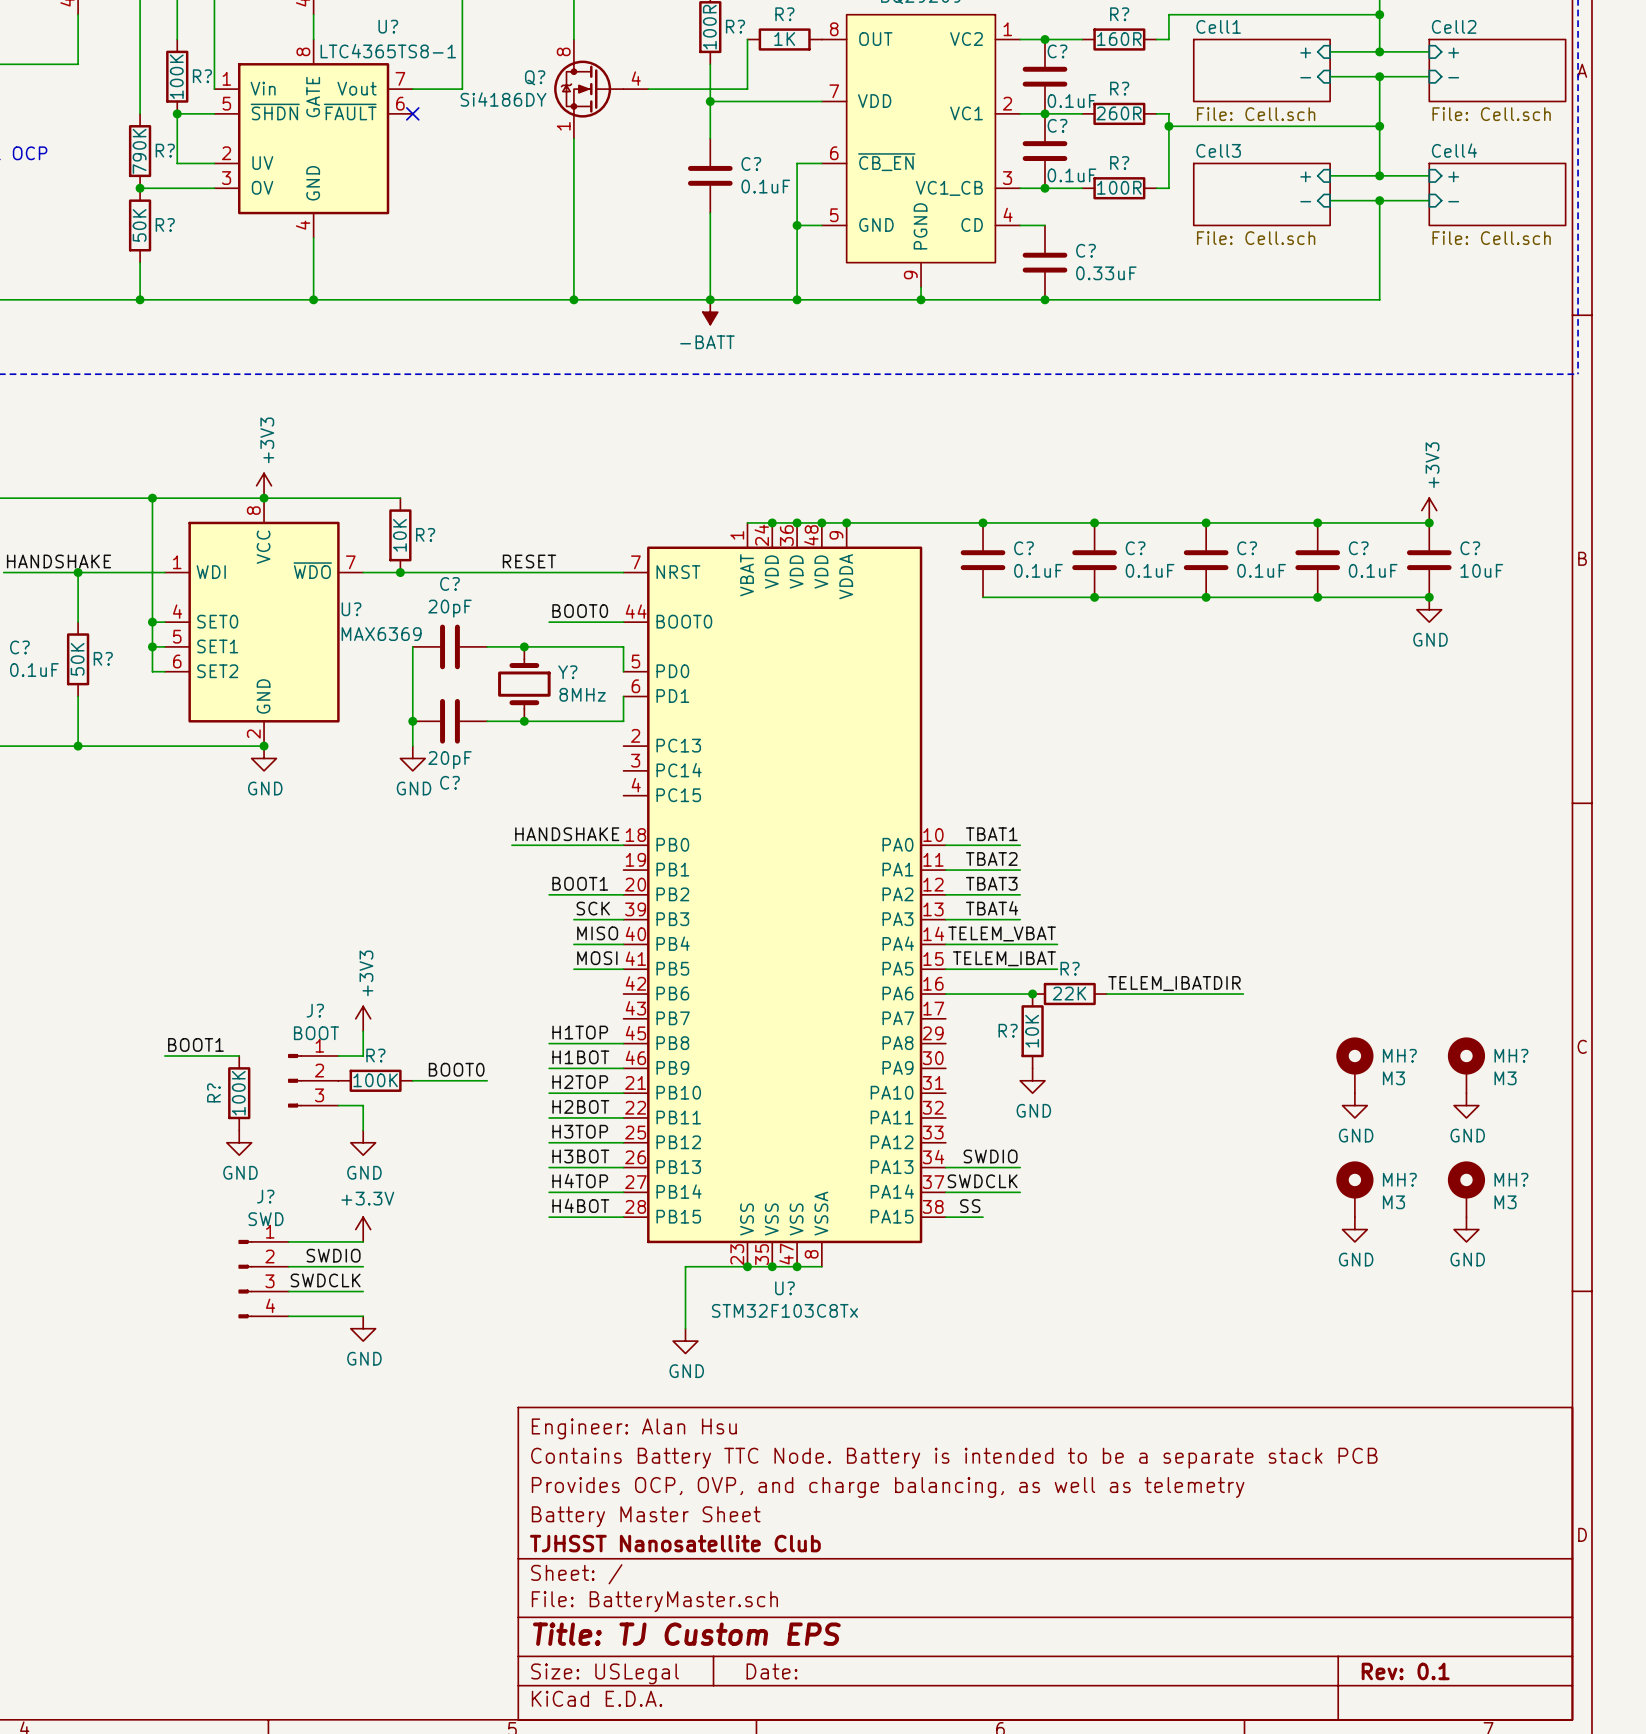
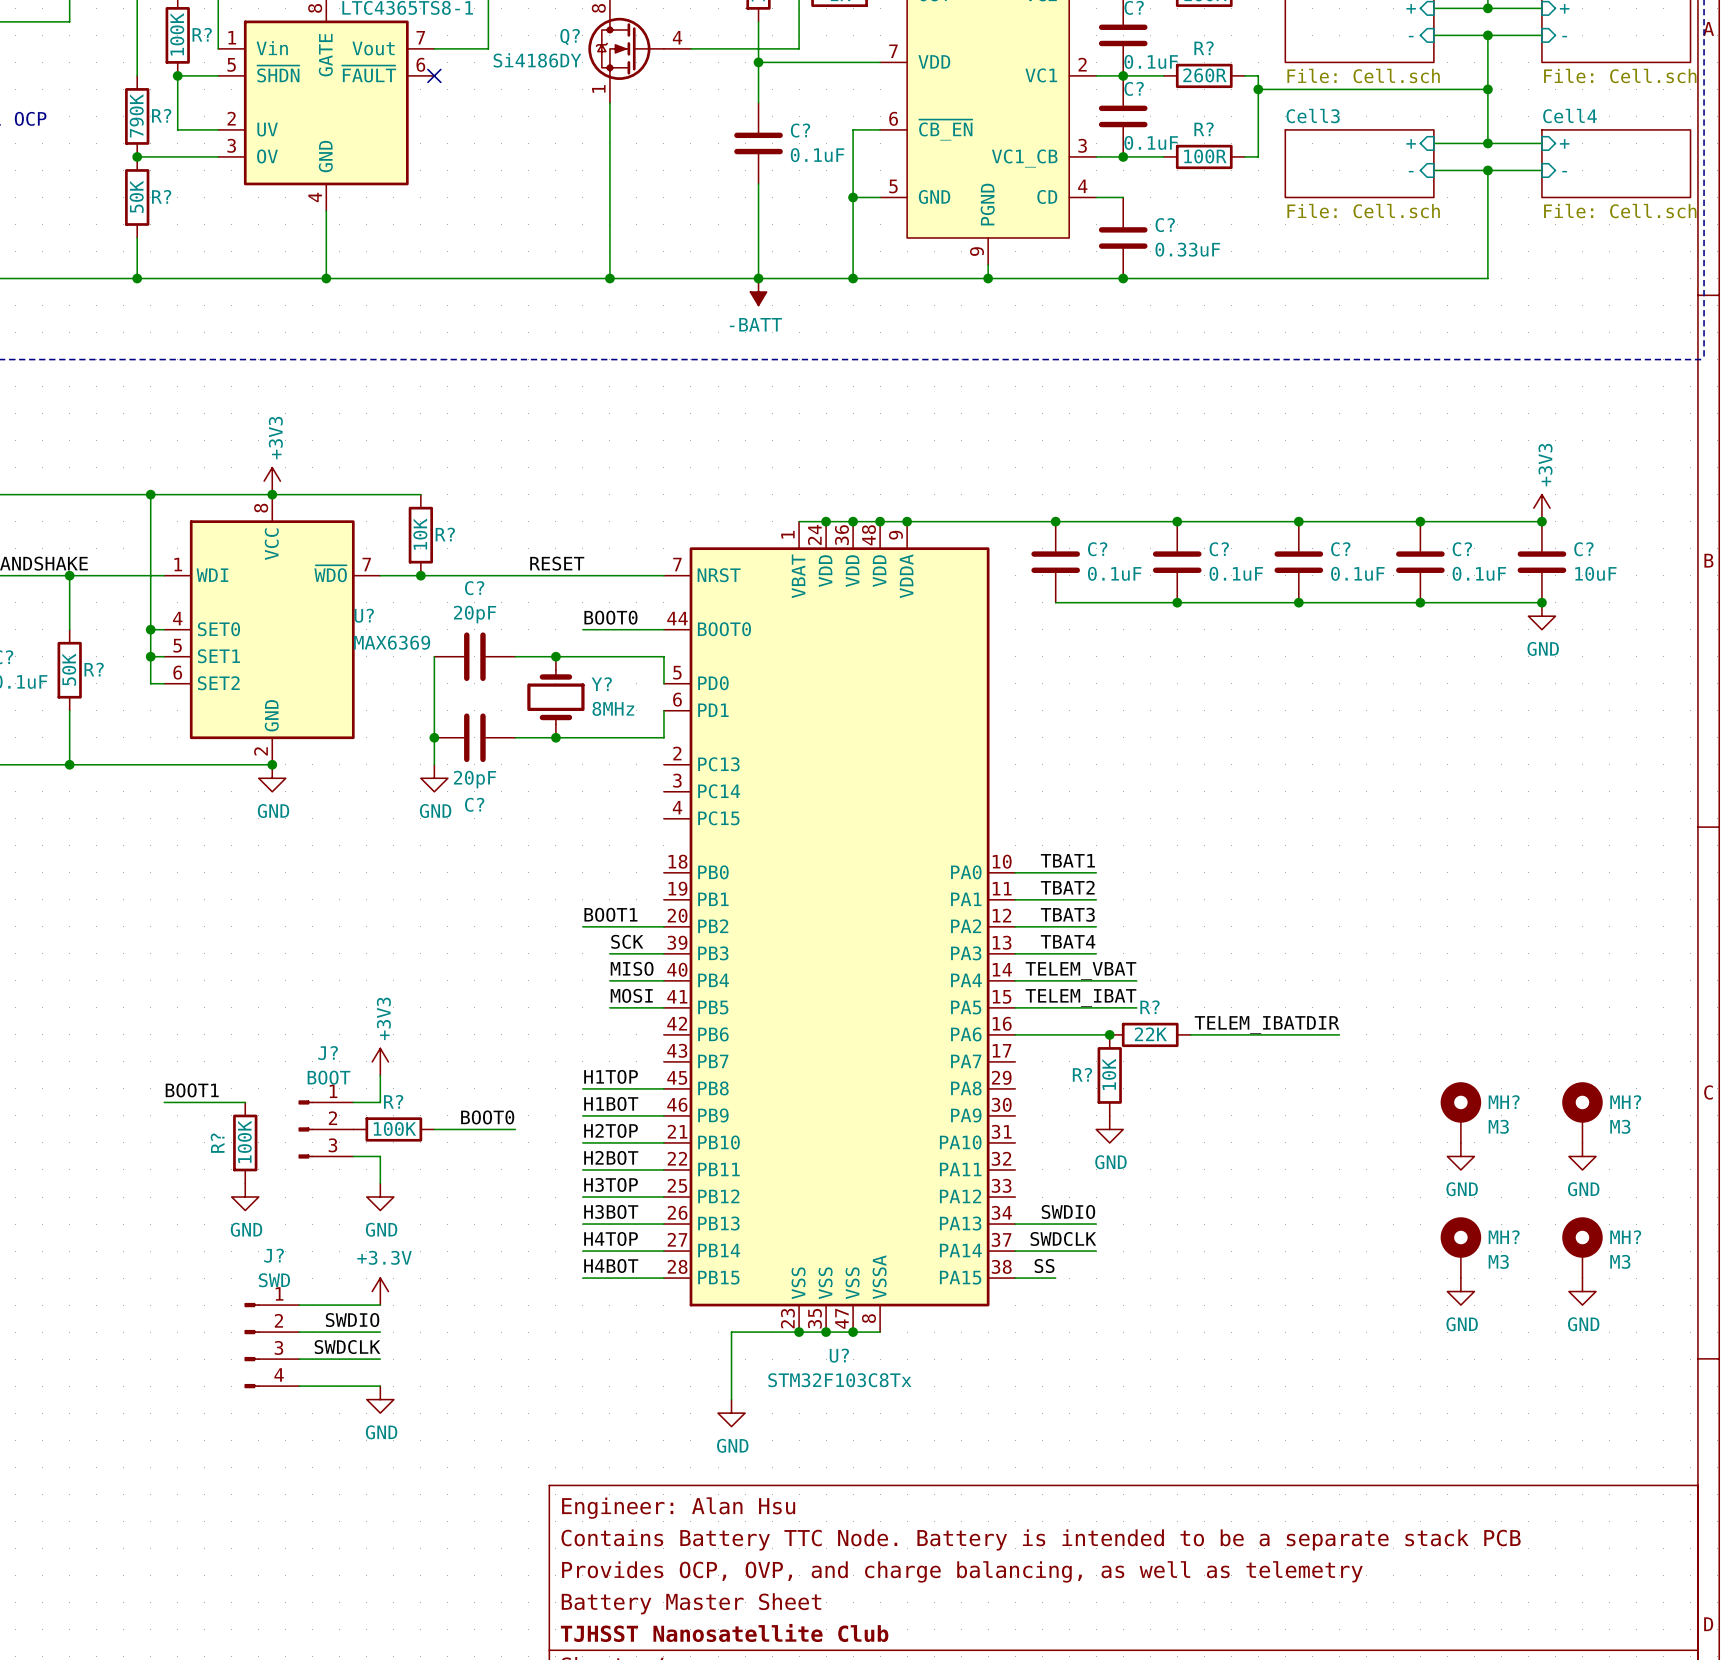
label: HANDSHAKE (567, 834) -> none
wire: (511, 845) (623, 845) -> none

